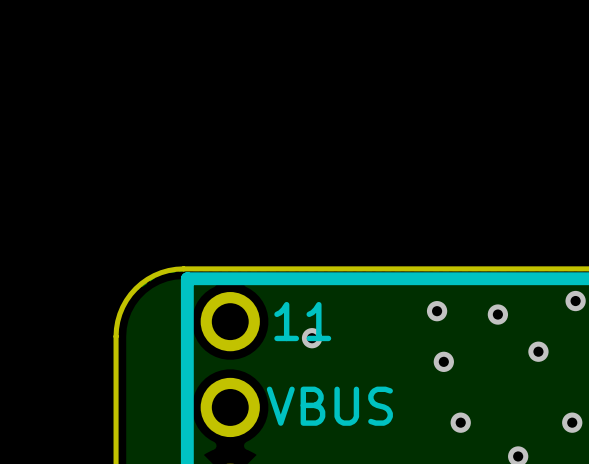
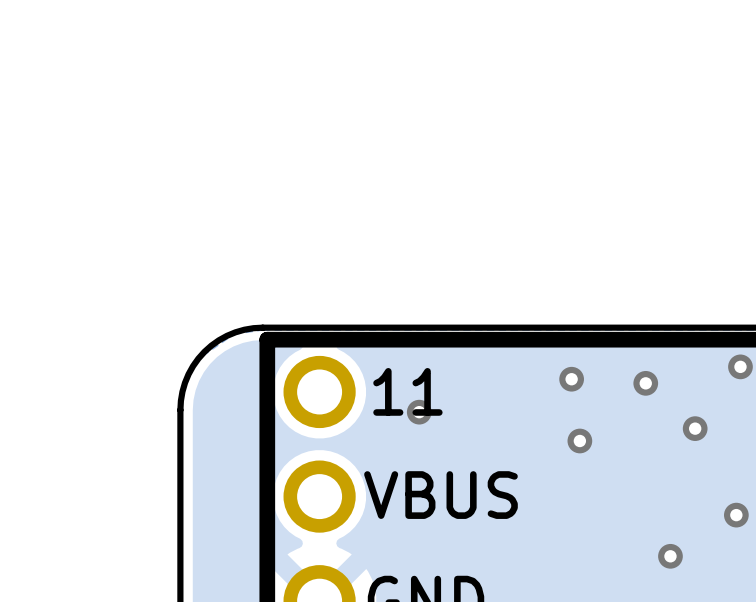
via: (460, 422) -> none

